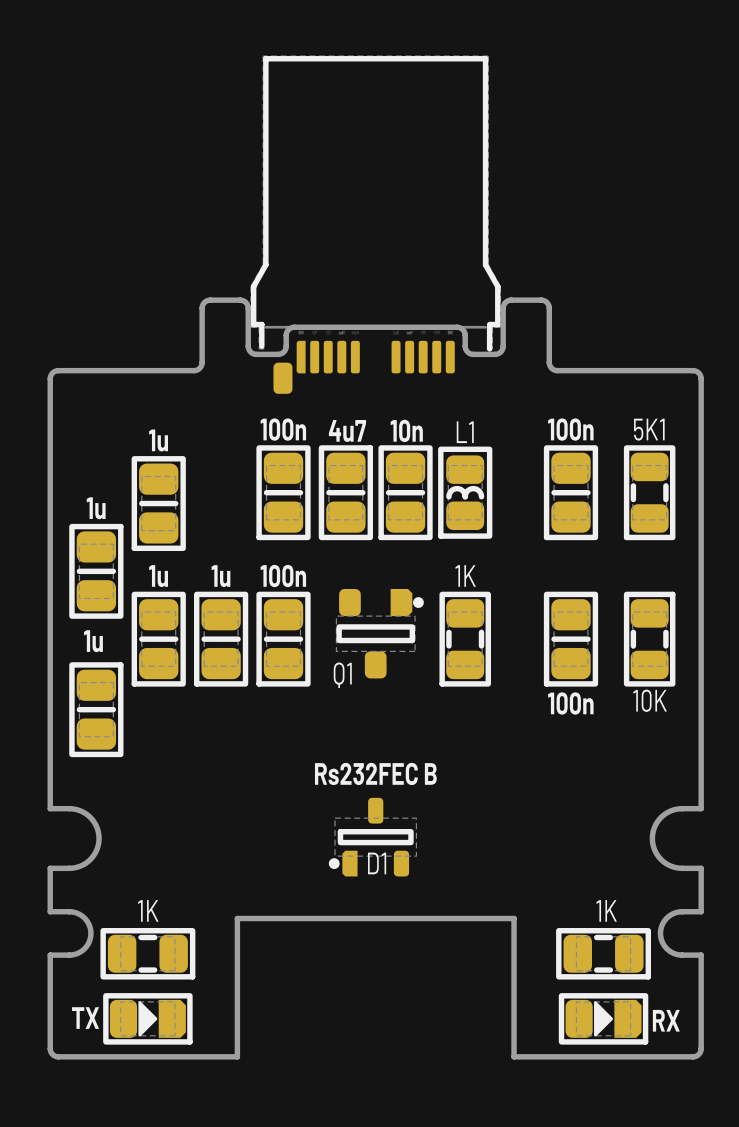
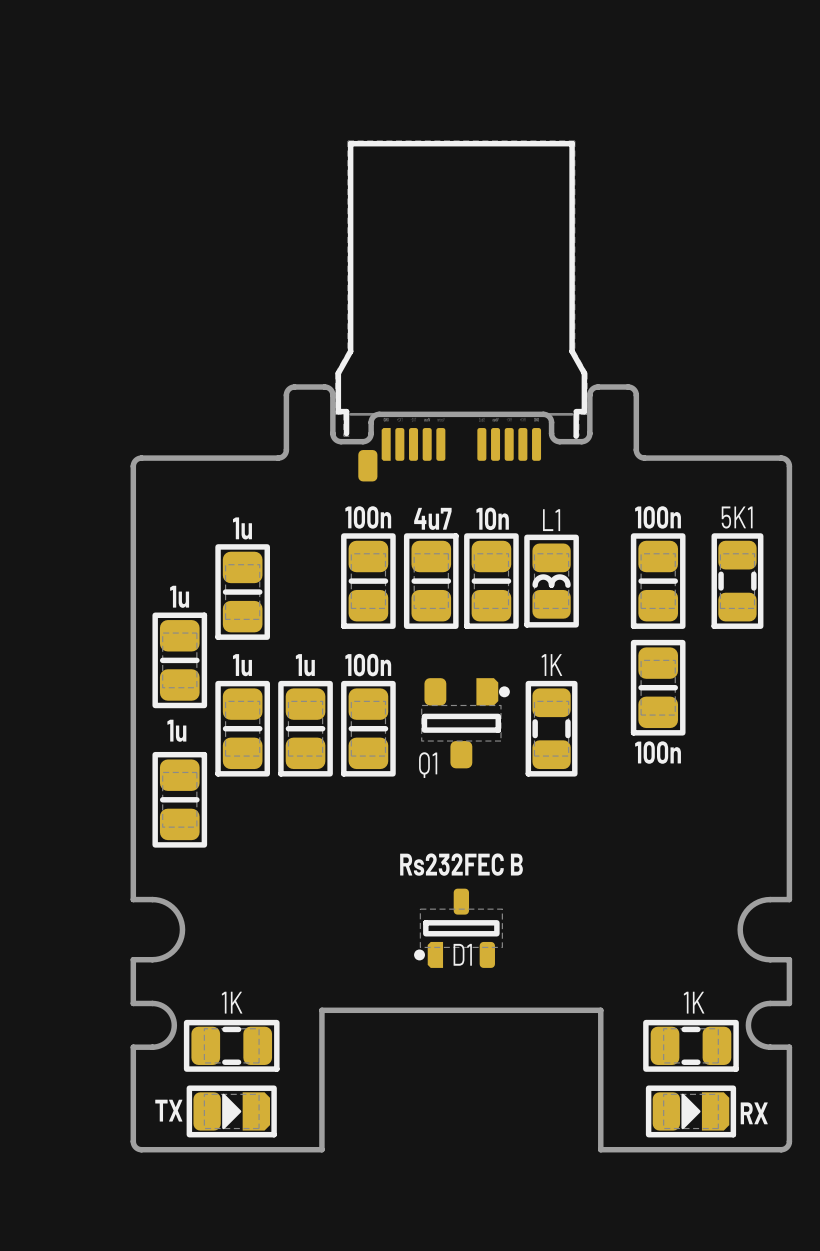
part position: (570, 639) -> (658, 687)
part: 10K (649, 639) -> none

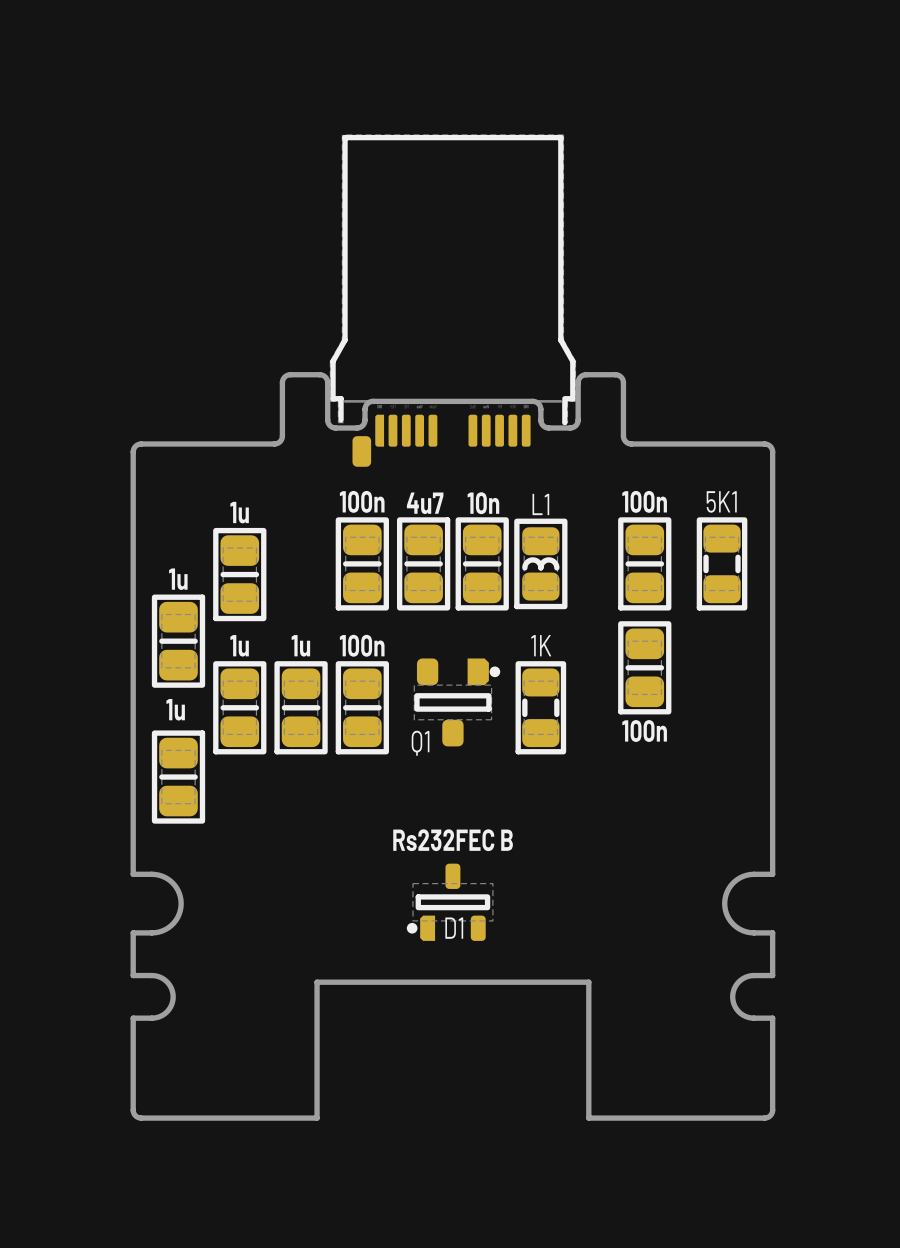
part: 1K (231, 1045) -> none
part: 1K (690, 1045) -> none
part: TX (231, 1111) -> none
part: RX (690, 1111) -> none

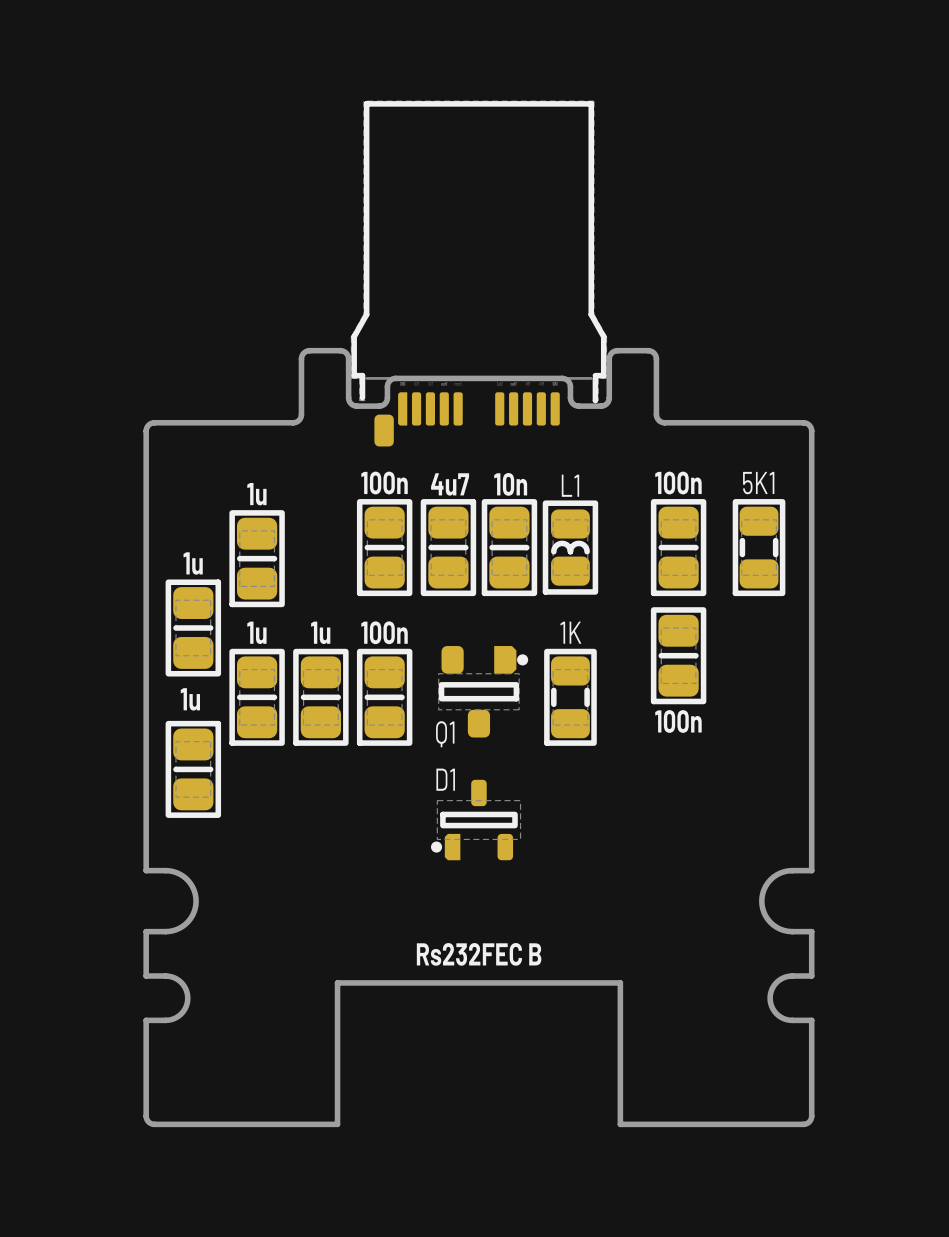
text position: Rs232FEC B (453, 840) -> Rs232FEC B (479, 954)
D1 position: (449, 902) -> (475, 820)
D1 name position: D1 (454, 928) -> D1 (445, 779)

